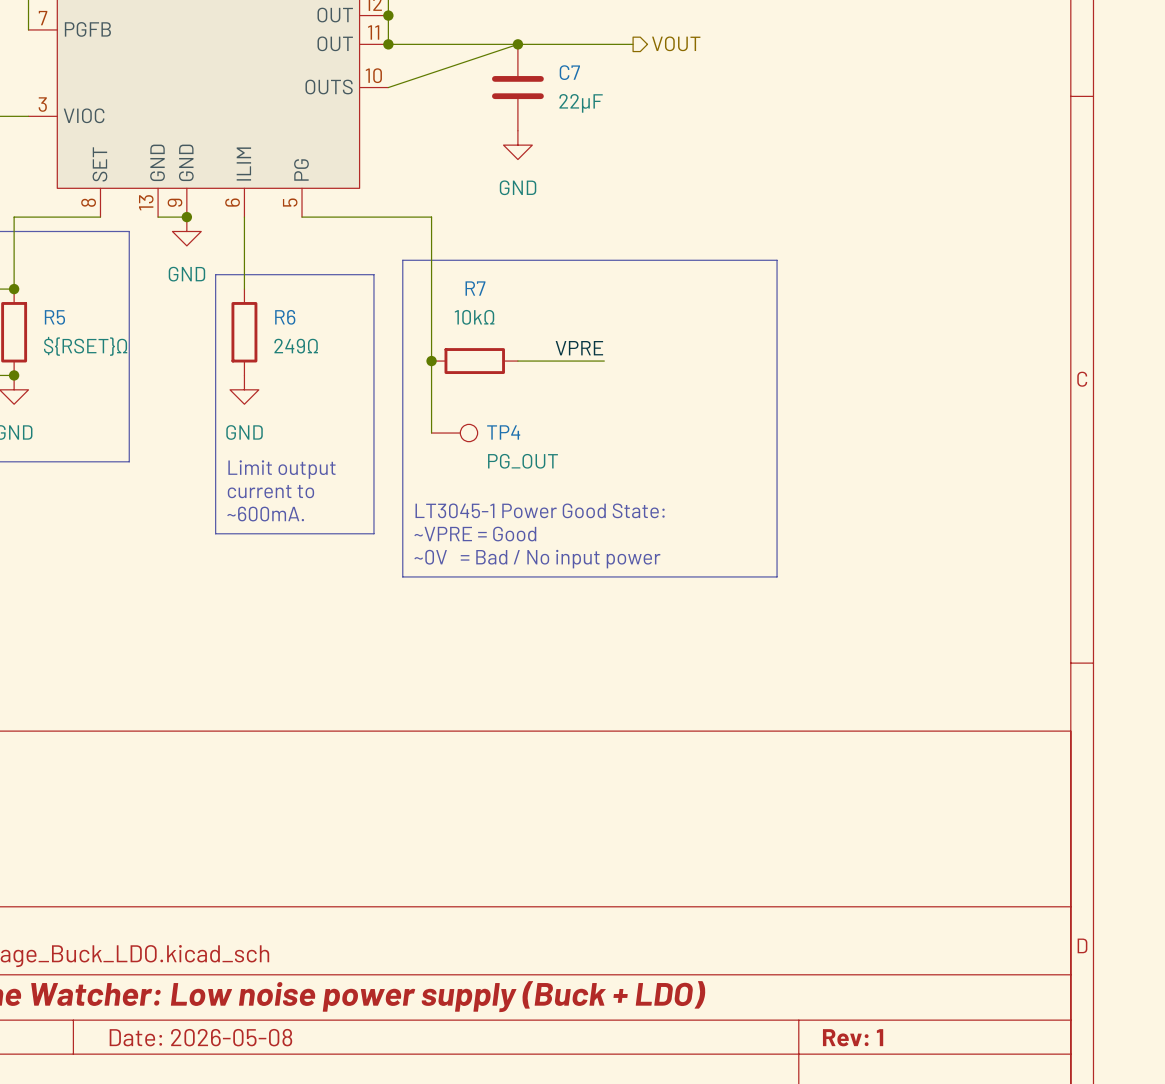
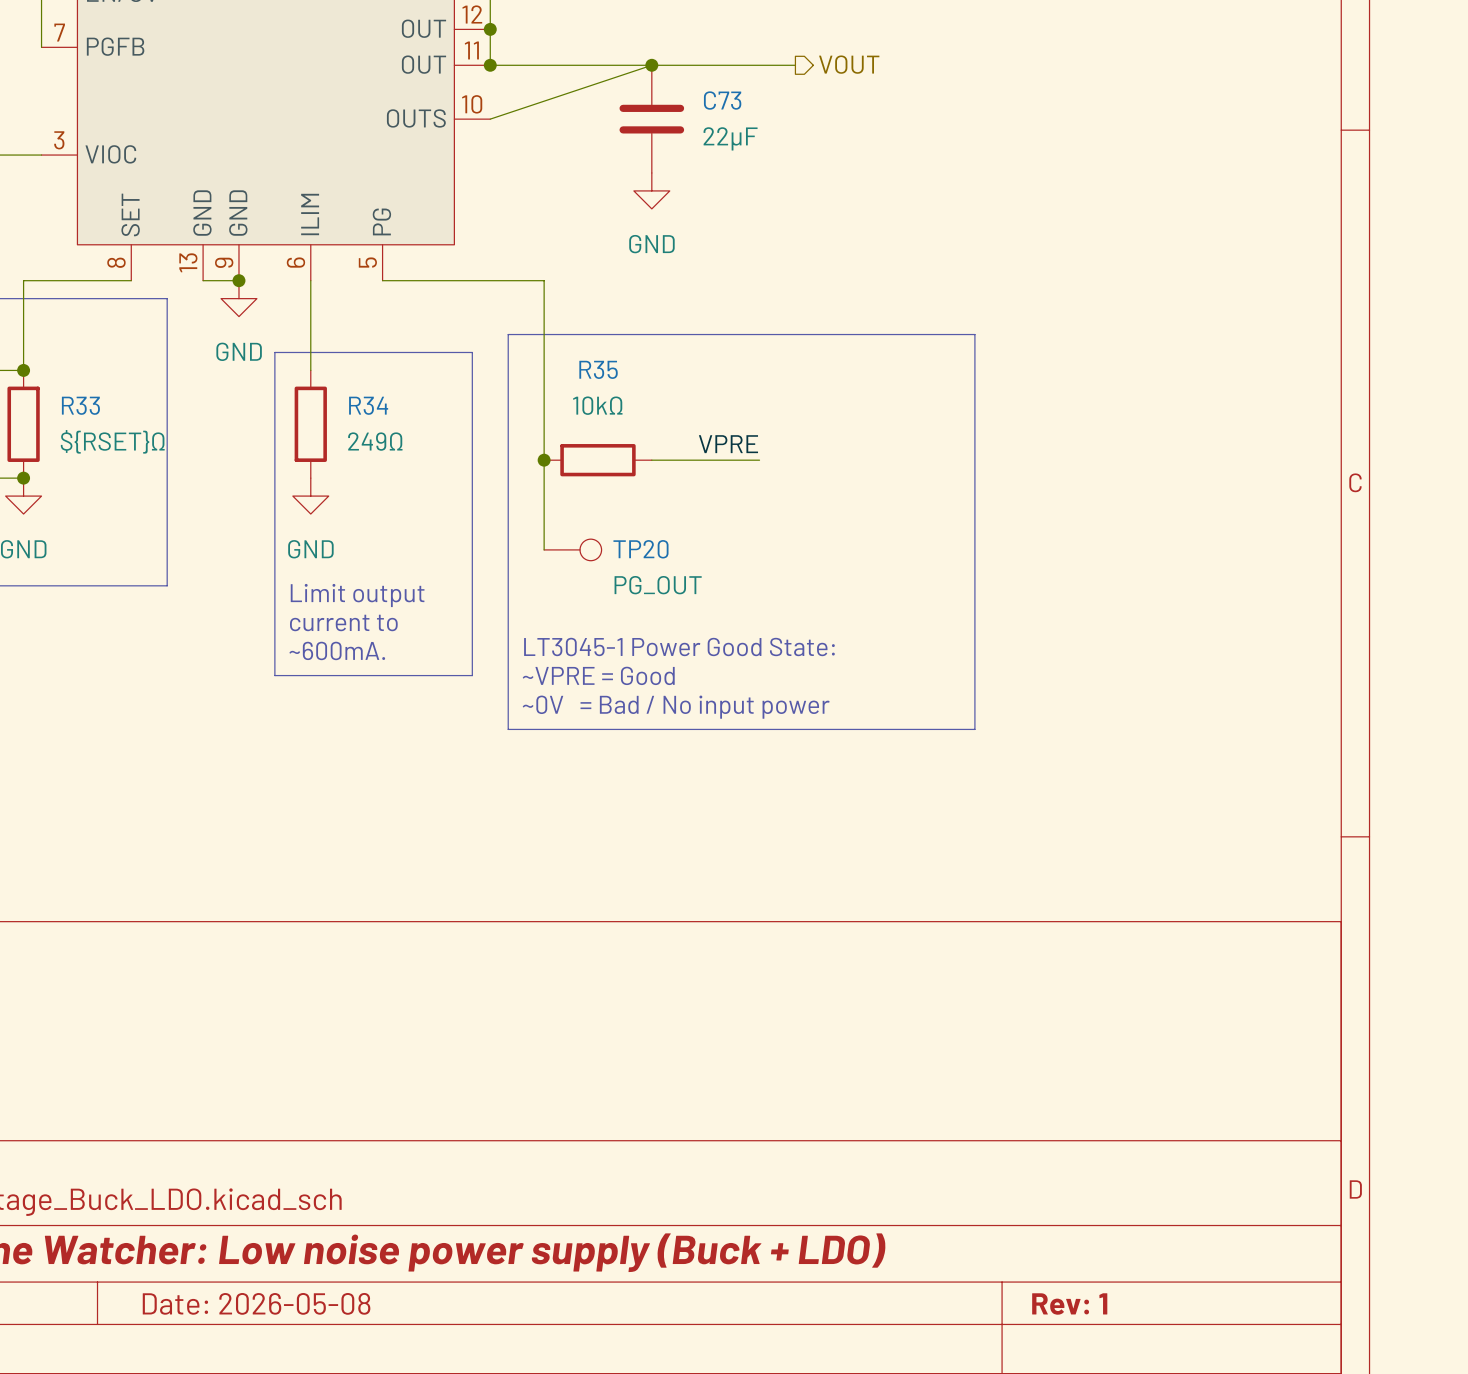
C7 name: C7 (569, 72) -> C73 (722, 100)
R7 name: R7 (475, 288) -> R35 (598, 369)
R5 name: R5 (54, 317) -> R33 (80, 405)
R6 name: R6 (285, 317) -> R34 (368, 405)
TP4 name: TP4 (503, 432) -> TP20 (640, 549)

